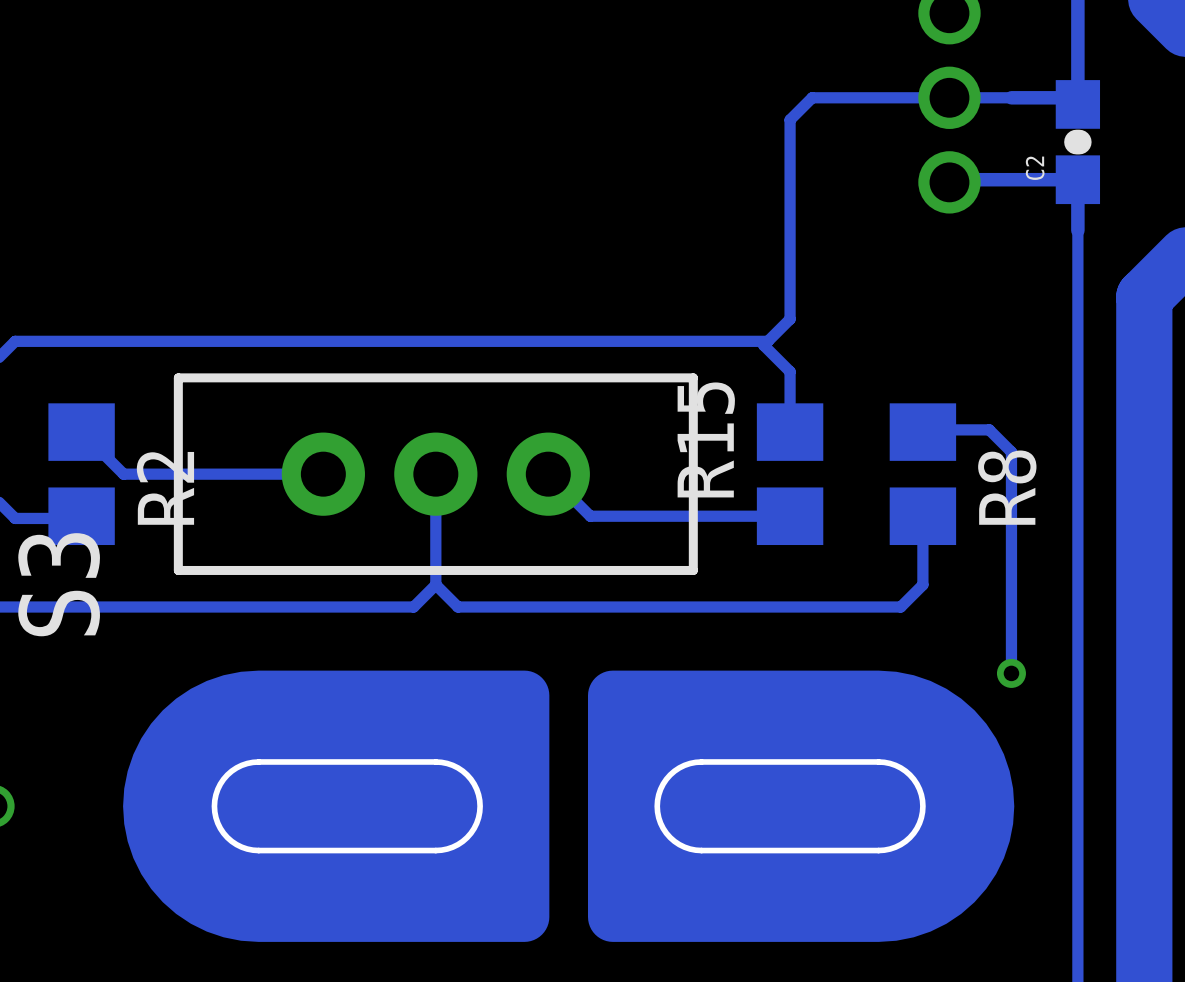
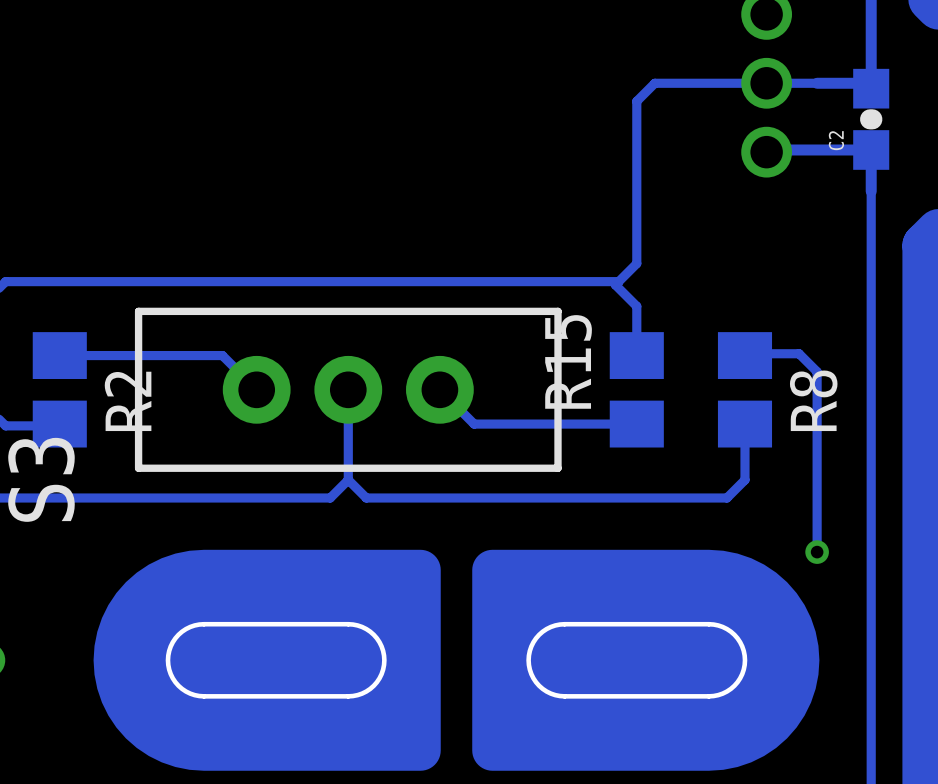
track: (81, 432) (123, 474) (323, 474) -> (59, 355) (222, 355) (256, 389)

